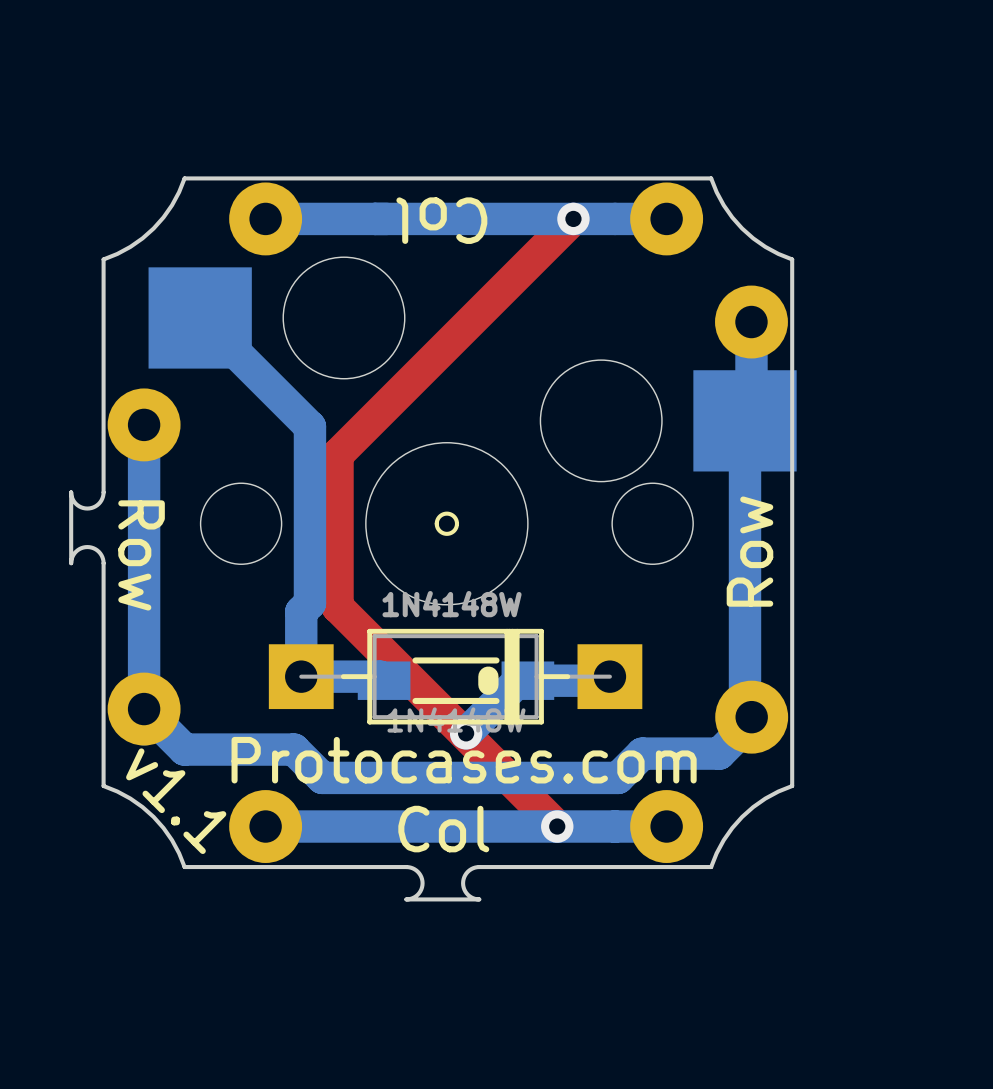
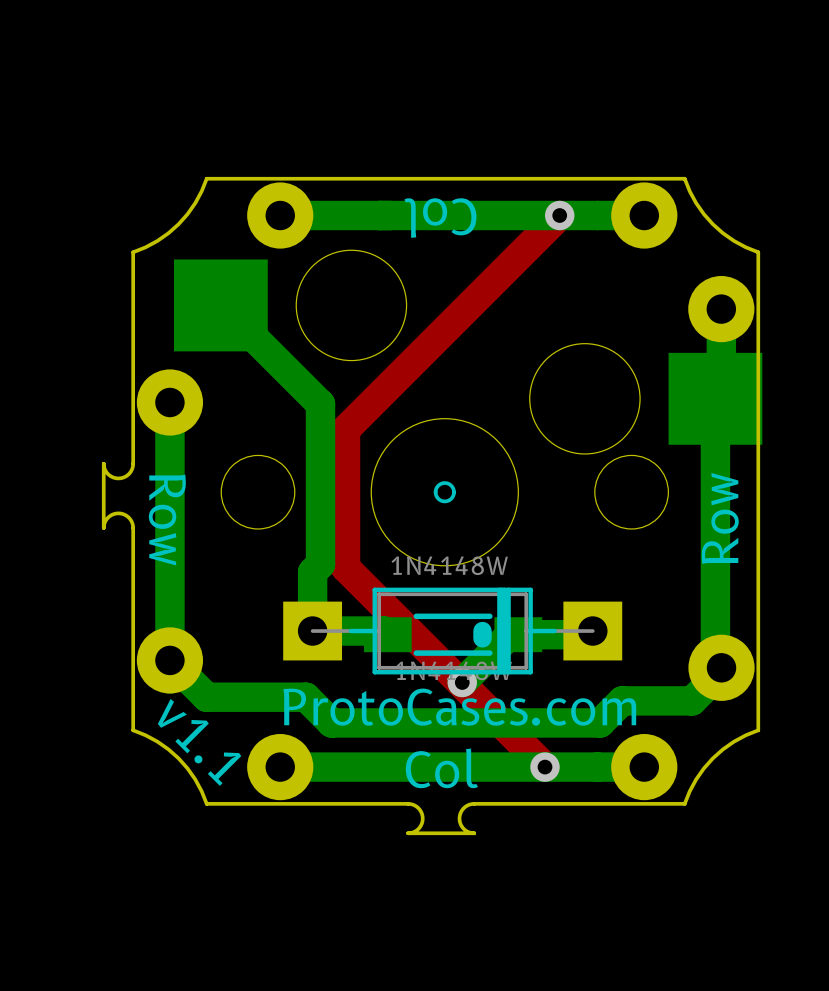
text: Protocases.com (464, 760) -> ProtoCases.com (459, 707)

